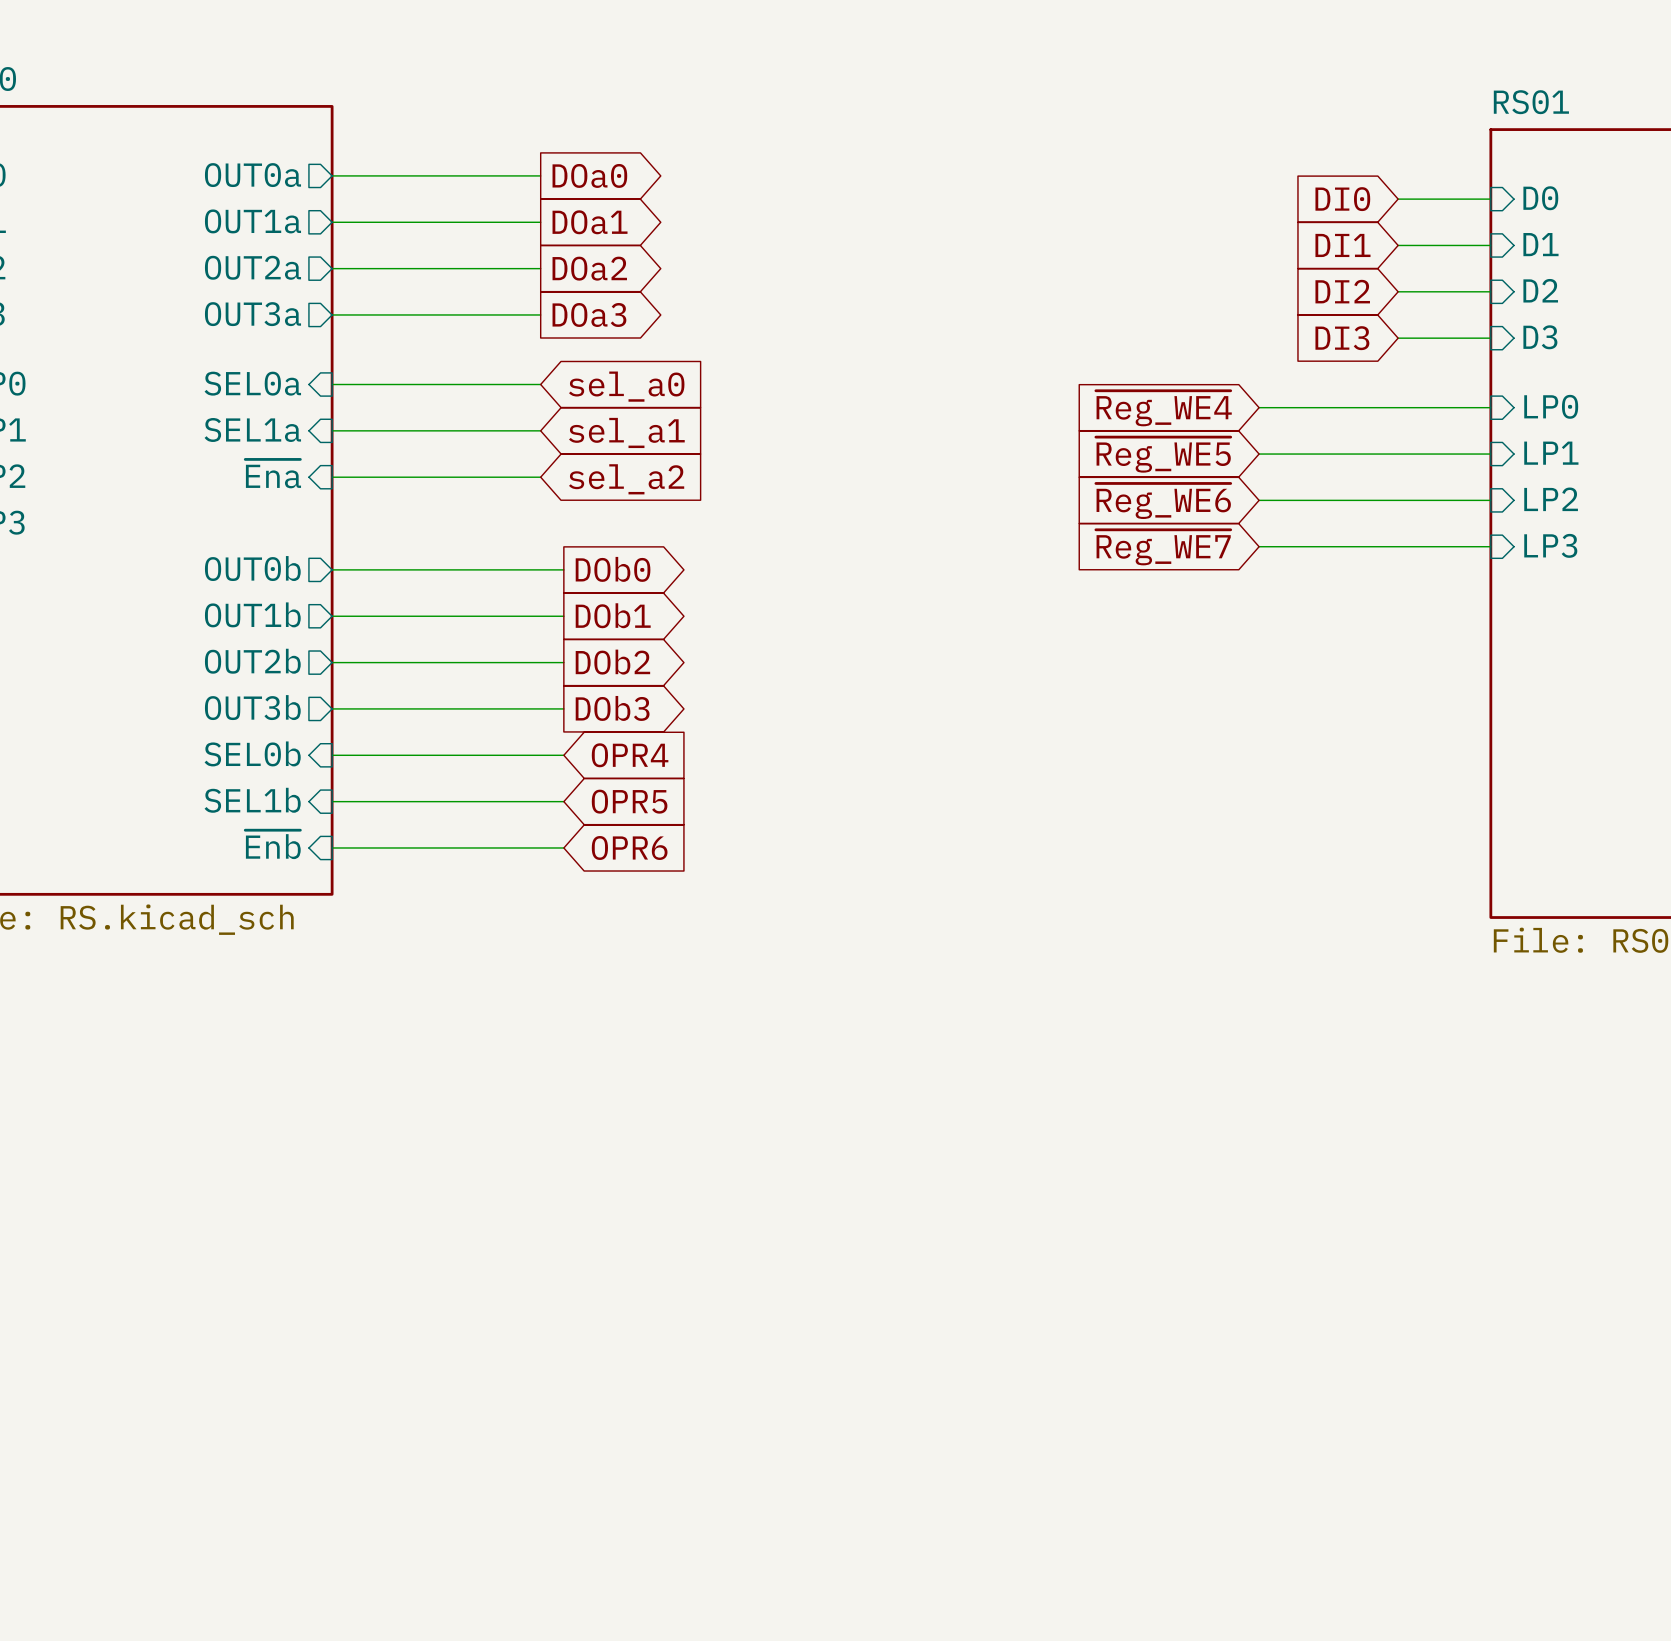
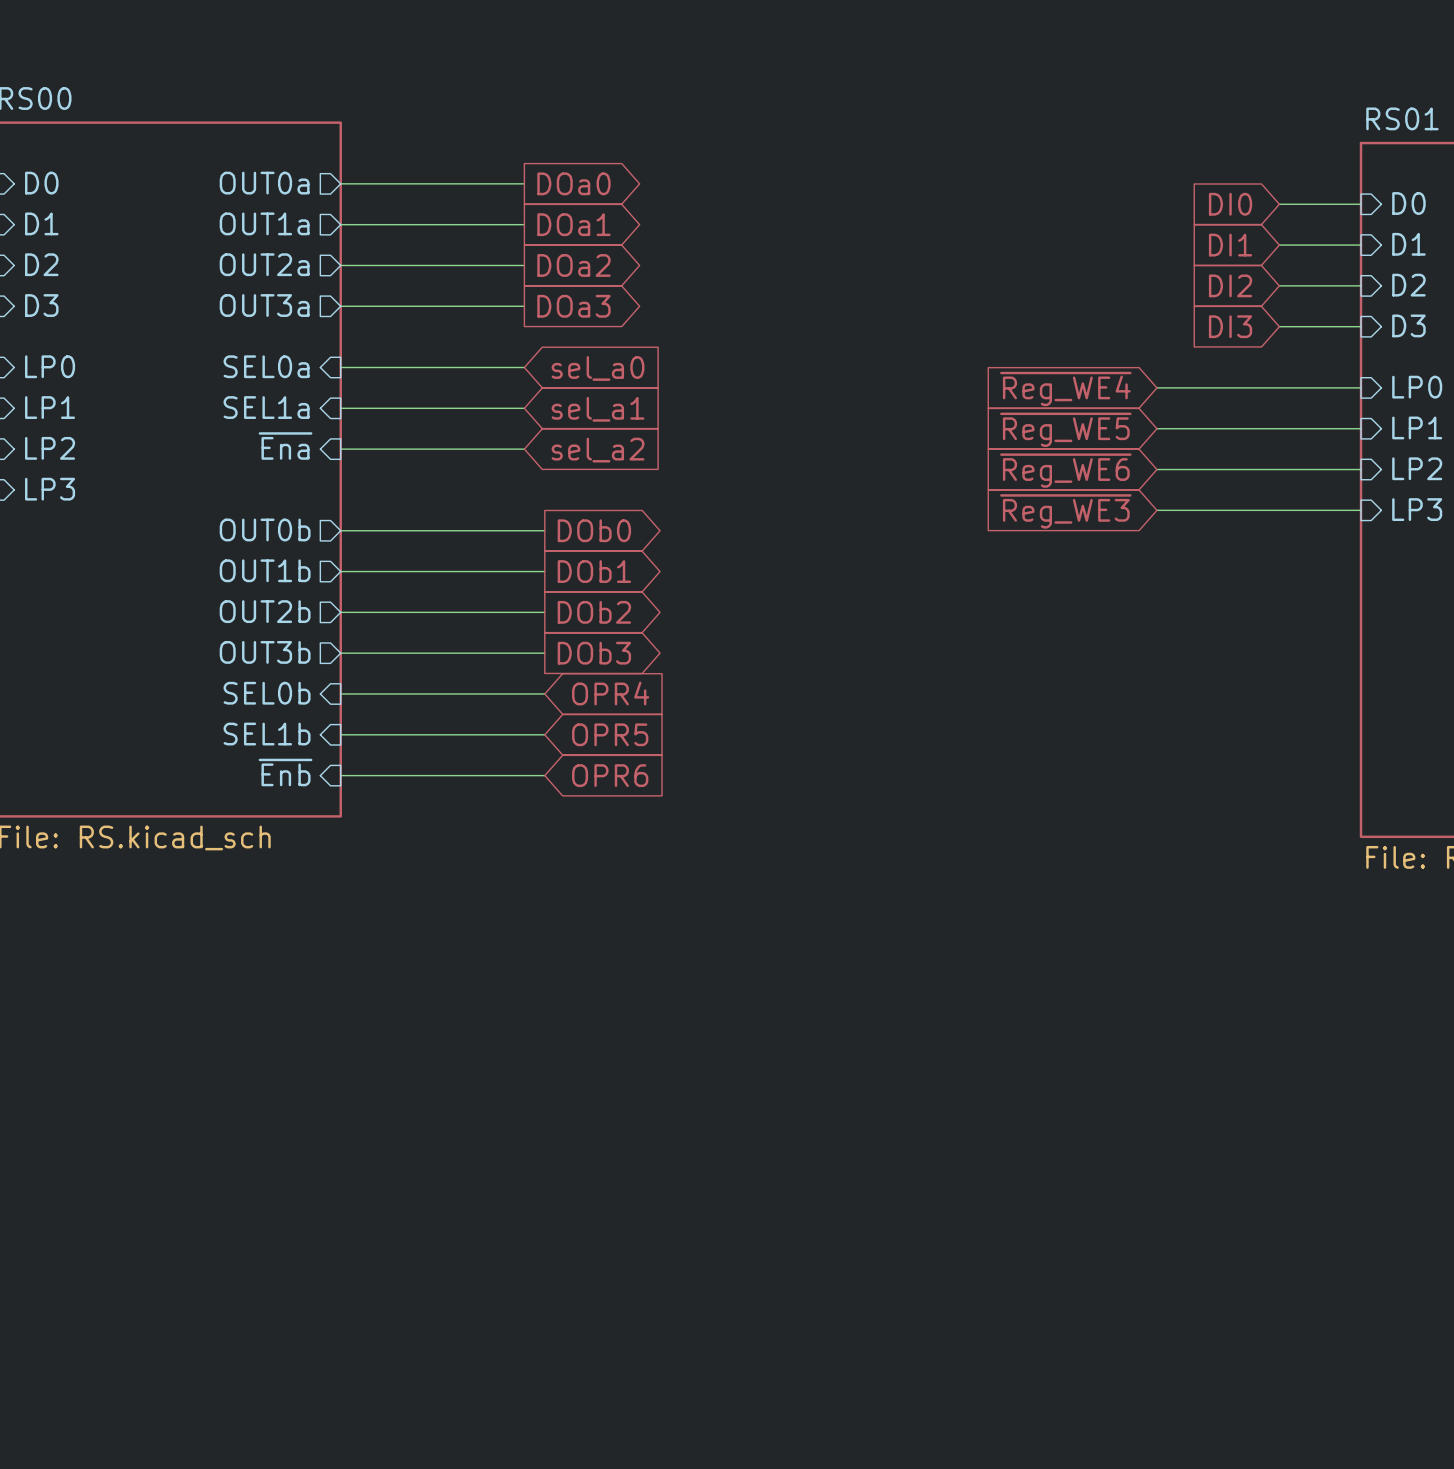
global label: ~{Reg_WE7} (1163, 547) -> ~{Reg_WE3} (1065, 511)

